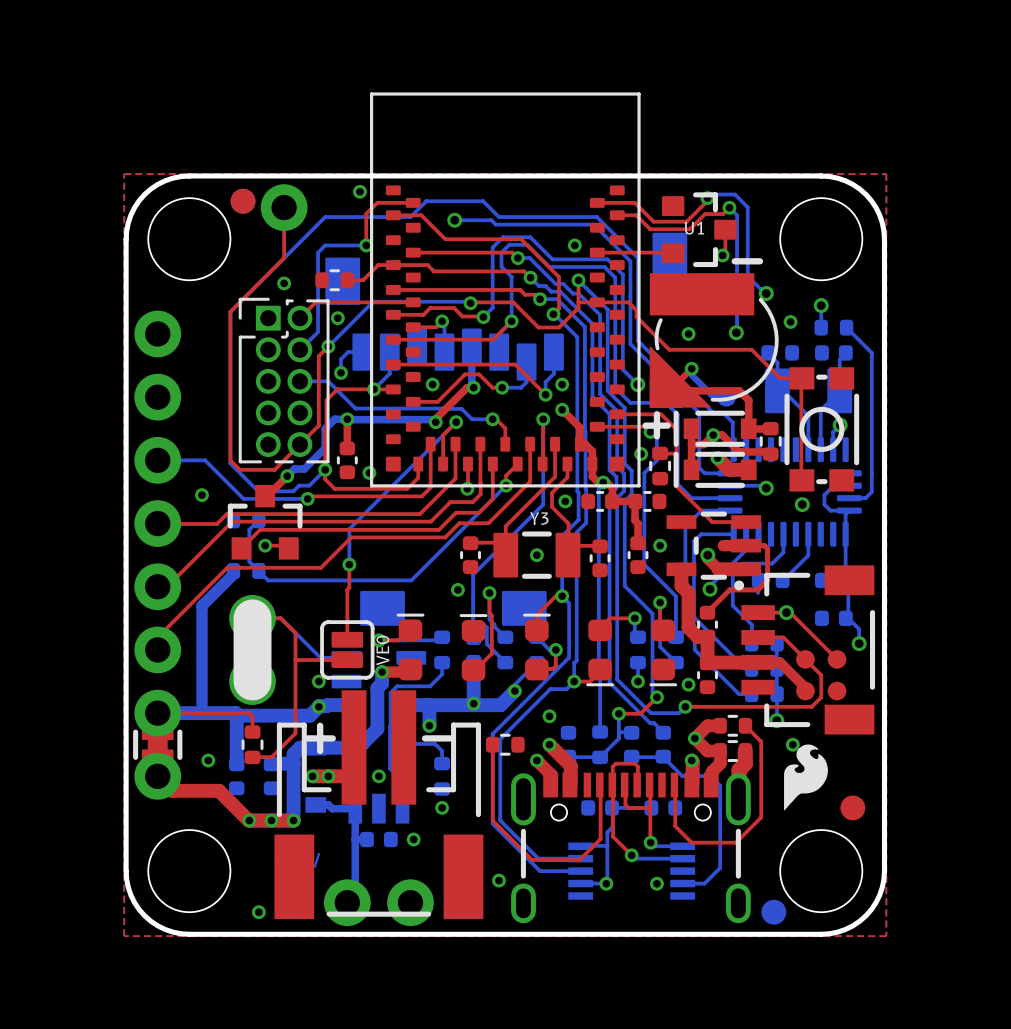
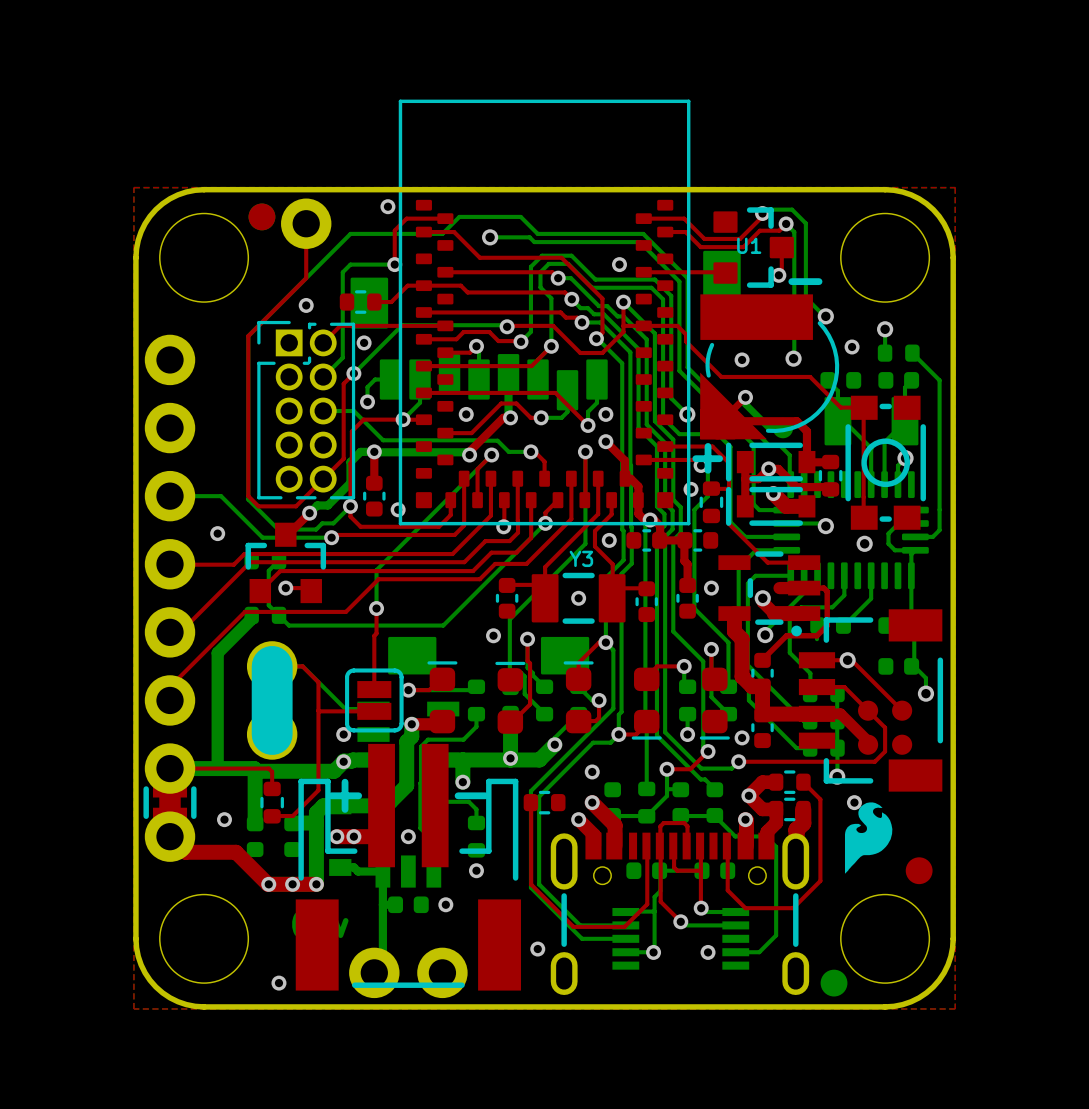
VE0: (347, 649) -> none
part: none -> (374, 700)

